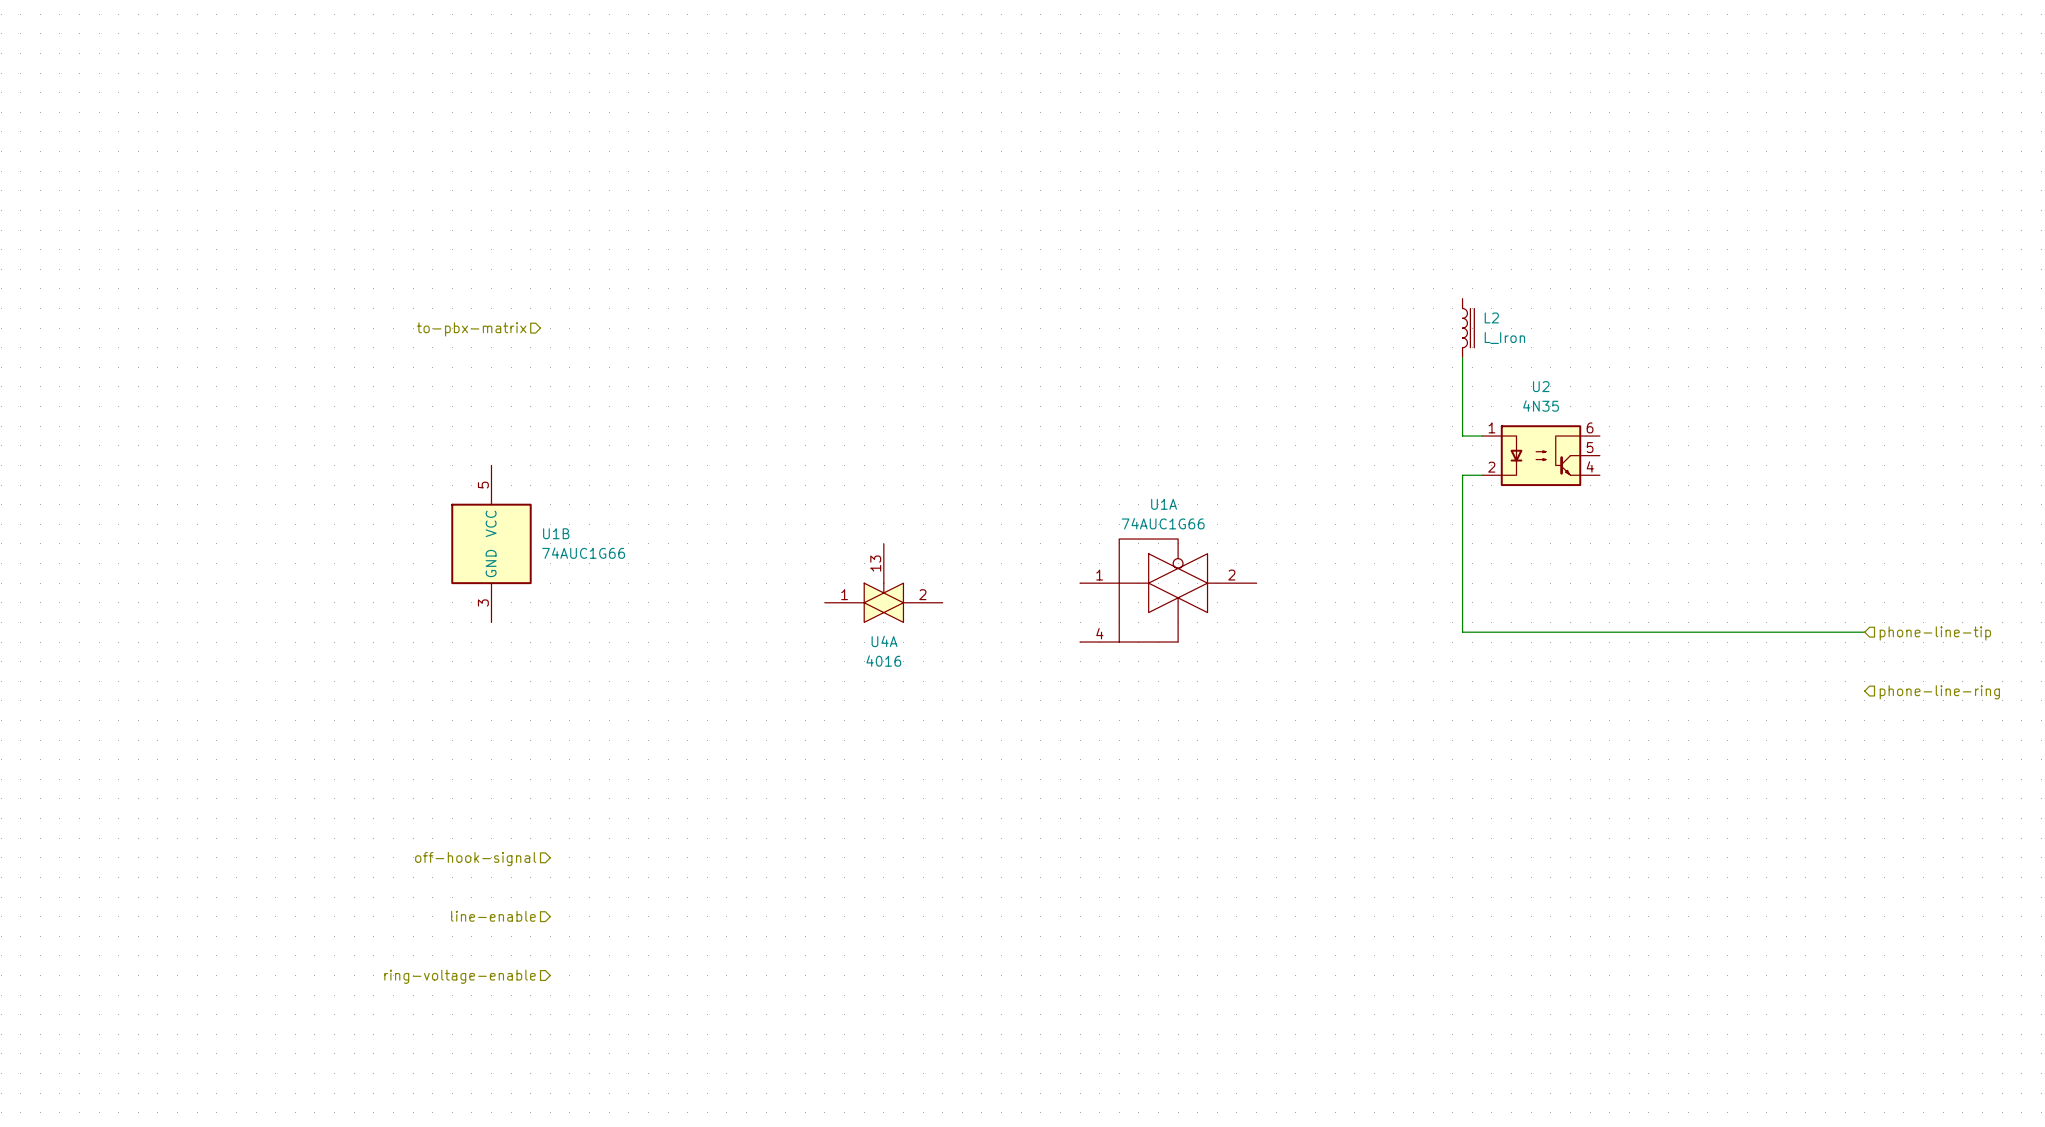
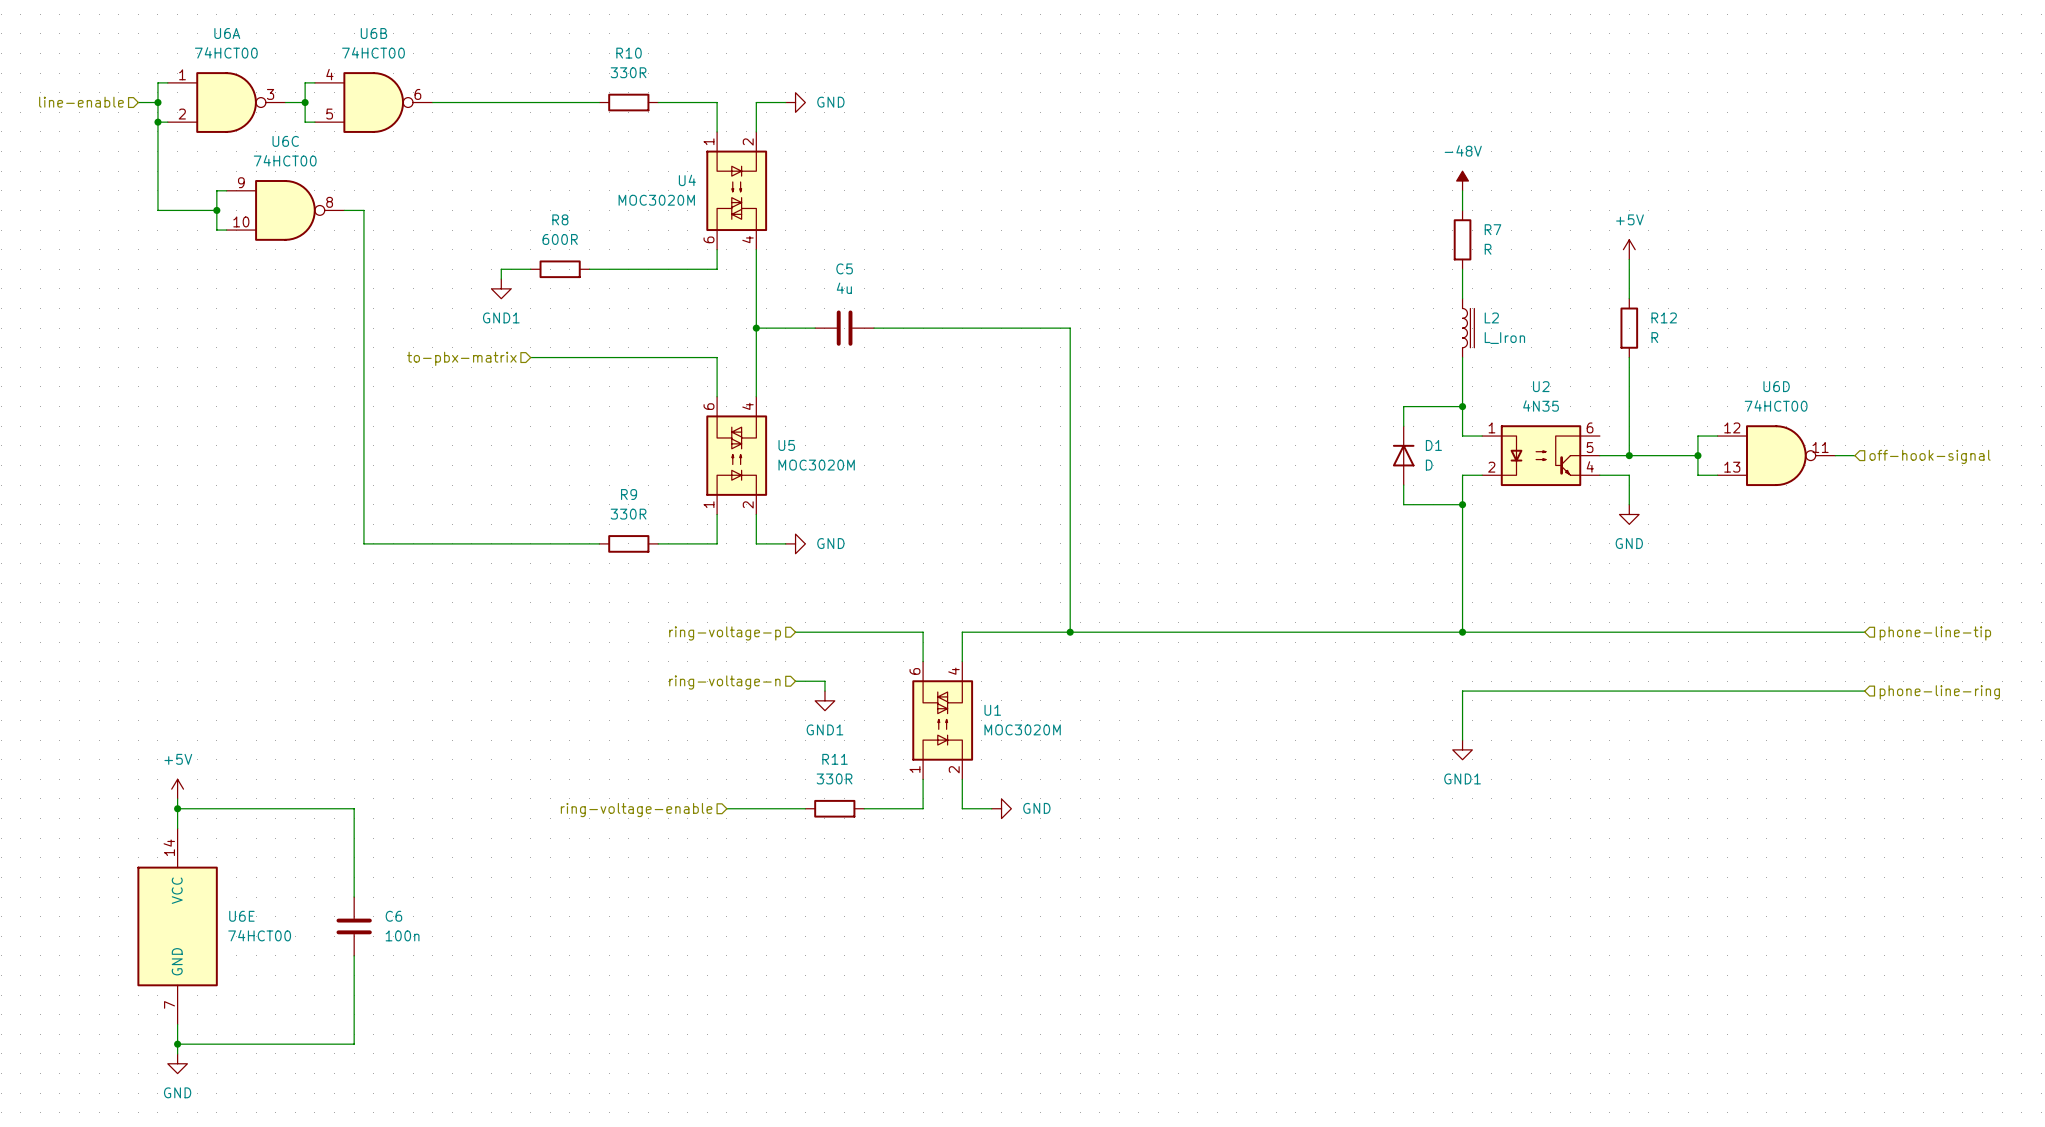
wire: none -> (167, 82) (157, 82) (157, 210) (216, 210)
wire: none -> (314, 82) (305, 82) (305, 122) (314, 122)
hierarchical label: none -> line-enable (81, 102)
wire: none -> (138, 102) (157, 102)
junction: none -> (157, 102)
U6A: none -> 74HCT00 (226, 102)
wire: none -> (285, 102) (305, 102)
junction: none -> (305, 102)
U6B: none -> 74HCT00 (373, 102)
wire: none -> (432, 102) (599, 102)
R10: none -> 330R (628, 102)
wire: none -> (658, 102) (717, 102) (717, 131)
wire: none -> (785, 102) (756, 102) (756, 131)
power symbol: none -> GND (795, 102)
wire: none -> (157, 122) (167, 122)
junction: none -> (157, 122)
power symbol: none -> -48V (1462, 180)
wire: none -> (226, 190) (216, 190) (216, 230) (226, 230)
U4: none -> MOC3020M (736, 190)
wire: none -> (1462, 190) (1462, 210)
junction: none -> (216, 210)
U6C: none -> 74HCT00 (285, 210)
wire: none -> (344, 210) (363, 210) (363, 543) (599, 543)
R7: none -> R (1462, 239)
wire: none -> (717, 249) (717, 269) (589, 269)
wire: none -> (756, 249) (756, 396)
power symbol: none -> +5V (1629, 249)
wire: none -> (1629, 259) (1629, 298)
wire: none -> (530, 269) (501, 269) (501, 279)
R8: none -> 600R (560, 269)
wire: none -> (1462, 269) (1462, 298)
power symbol: none -> GND1 (501, 288)
wire: none -> (756, 328) (815, 328)
junction: none -> (756, 328)
C5: none -> 4u (844, 328)
wire: none -> (874, 328) (1070, 328) (1070, 632)
R12: none -> R (1629, 328)
hierarchical label position: to-pbx-matrix (471, 329) -> to-pbx-matrix (461, 358)
wire: none -> (530, 357) (717, 357) (717, 396)
wire: none -> (1629, 357) (1629, 455)
wire: none -> (1462, 406) (1403, 406) (1403, 426)
junction: none -> (1462, 406)
wire: none -> (1717, 436) (1697, 436) (1697, 475) (1717, 475)
U5: none -> MOC3020M (736, 455)
D1: none -> D (1403, 455)
wire: none -> (1599, 455) (1697, 455)
junction: none -> (1629, 455)
junction: none -> (1697, 455)
U6D: none -> 74HCT00 (1776, 455)
wire: none -> (1835, 455) (1854, 455)
hierarchical label: none -> off-hook-signal (1930, 456)
wire: none -> (1599, 475) (1629, 475) (1629, 504)
wire: none -> (1403, 485) (1403, 504) (1462, 504)
junction: none -> (1462, 504)
wire: none -> (717, 514) (717, 543) (658, 543)
wire: none -> (756, 514) (756, 543) (785, 543)
power symbol: none -> GND (1629, 514)
U1B: 74AUC1G66 (491, 543) -> none
R9: none -> 330R (628, 543)
power symbol: none -> GND (795, 543)
U4A: 4016 (883, 583) -> none
U1A: 74AUC1G66 (1168, 590) -> none
wire: none -> (795, 632) (923, 632) (923, 661)
junction: none -> (1070, 632)
wire: none -> (1462, 632) (962, 632) (962, 661)
junction: none -> (1462, 632)
hierarchical label: none -> ring-voltage-p (725, 633)
wire: none -> (795, 681) (824, 681) (824, 691)
hierarchical label: none -> ring-voltage-n (724, 682)
wire: none -> (1864, 691) (1462, 691) (1462, 740)
power symbol: none -> GND1 (824, 700)
U1: none -> MOC3020M (942, 720)
power symbol: none -> GND1 (1462, 749)
wire: none -> (923, 779) (923, 808) (864, 808)
wire: none -> (962, 779) (962, 808) (991, 808)
power symbol: none -> +5V (177, 789)
wire: none -> (177, 798) (177, 828)
wire: none -> (177, 808) (354, 808) (354, 897)
junction: none -> (177, 808)
wire: none -> (726, 808) (805, 808)
R11: none -> 330R (834, 808)
power symbol: none -> GND (1001, 808)
hierarchical label: none -> ring-voltage-enable (636, 810)
hierarchical label: off-hook-signal (475, 859) -> none
hierarchical label: line-enable (493, 916) -> none
U6E: none -> 74HCT00 (177, 926)
C6: none -> 100n (354, 926)
wire: none -> (354, 955) (354, 1044) (177, 1044)
hierarchical label: ring-voltage-enable (460, 976) -> none
wire: none -> (177, 1024) (177, 1053)
junction: none -> (177, 1044)
power symbol: none -> GND (177, 1063)

